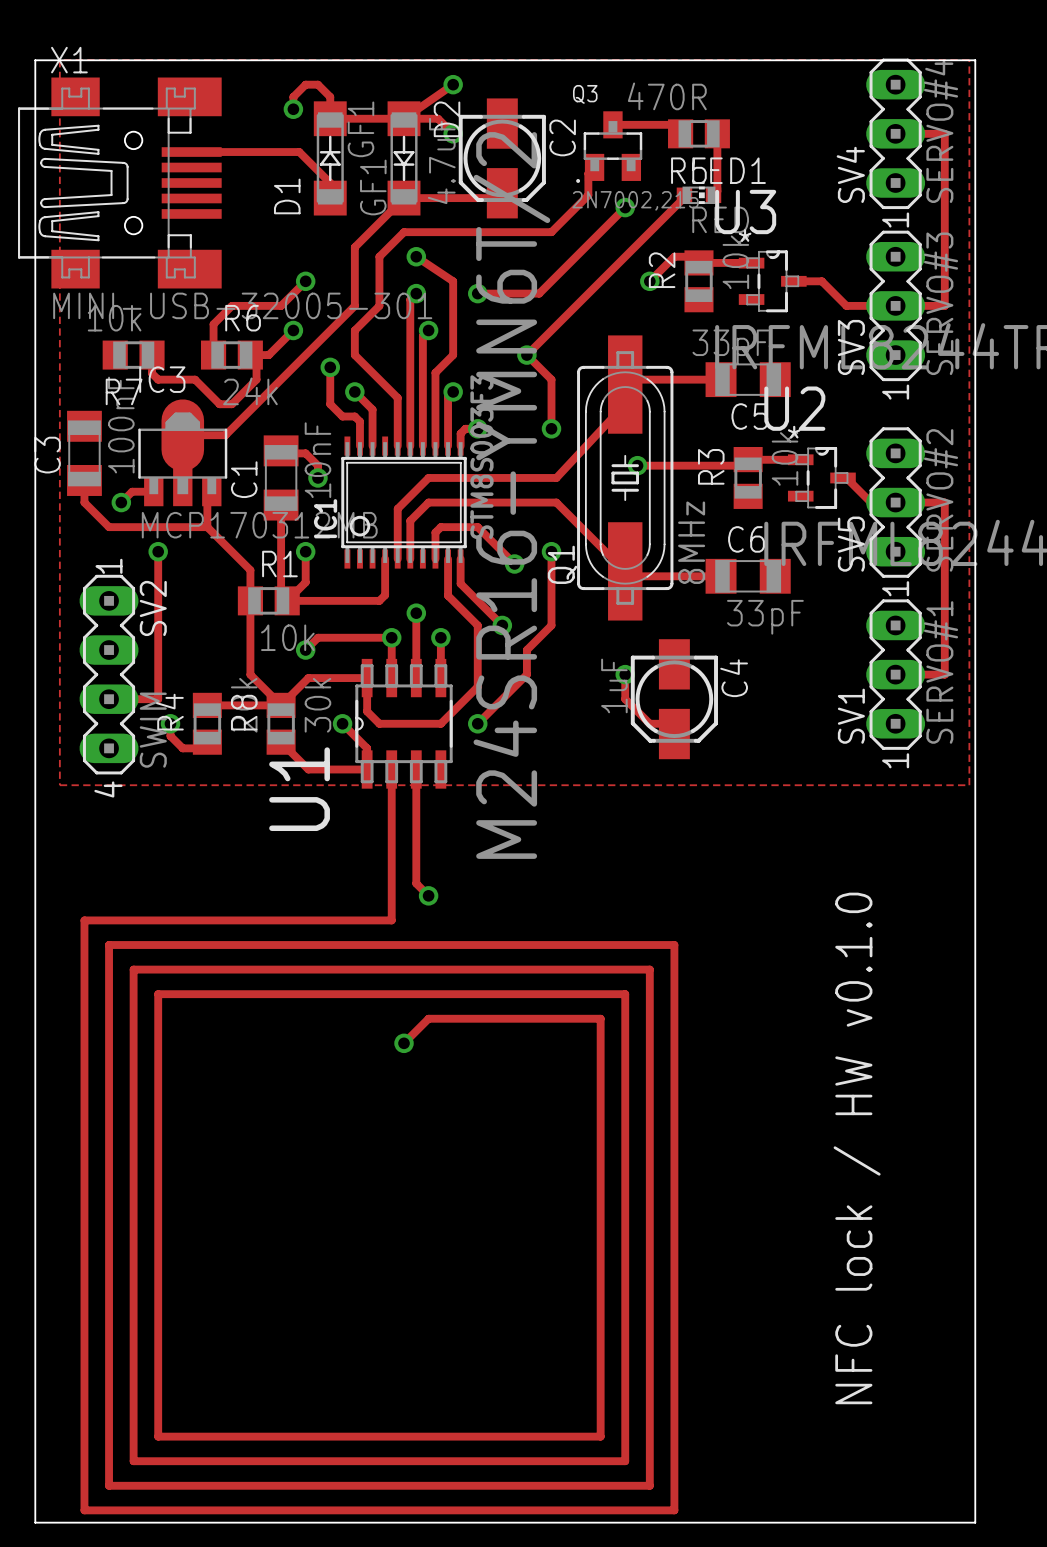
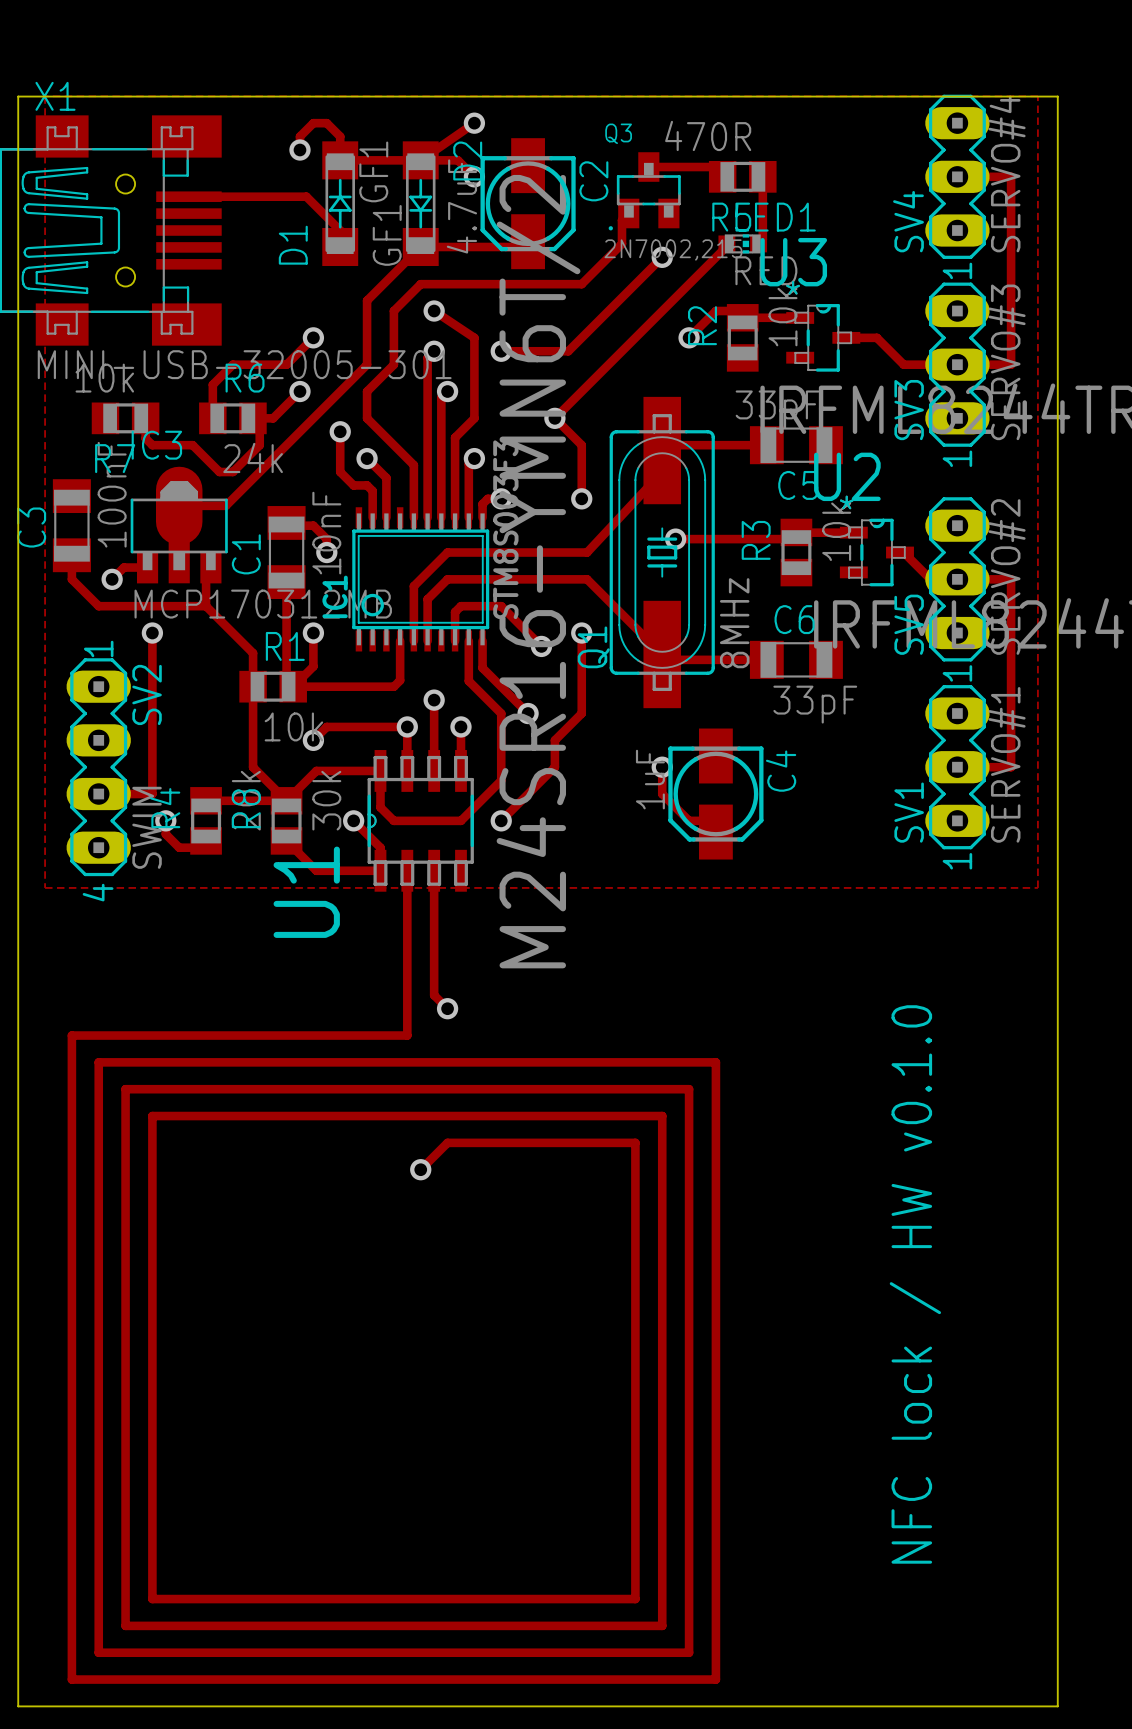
board edge: (975, 60) (975, 1522) (35, 1522) -> (1044, 96) (1057, 96) (1057, 1706) (18, 1706) (18, 1692)

